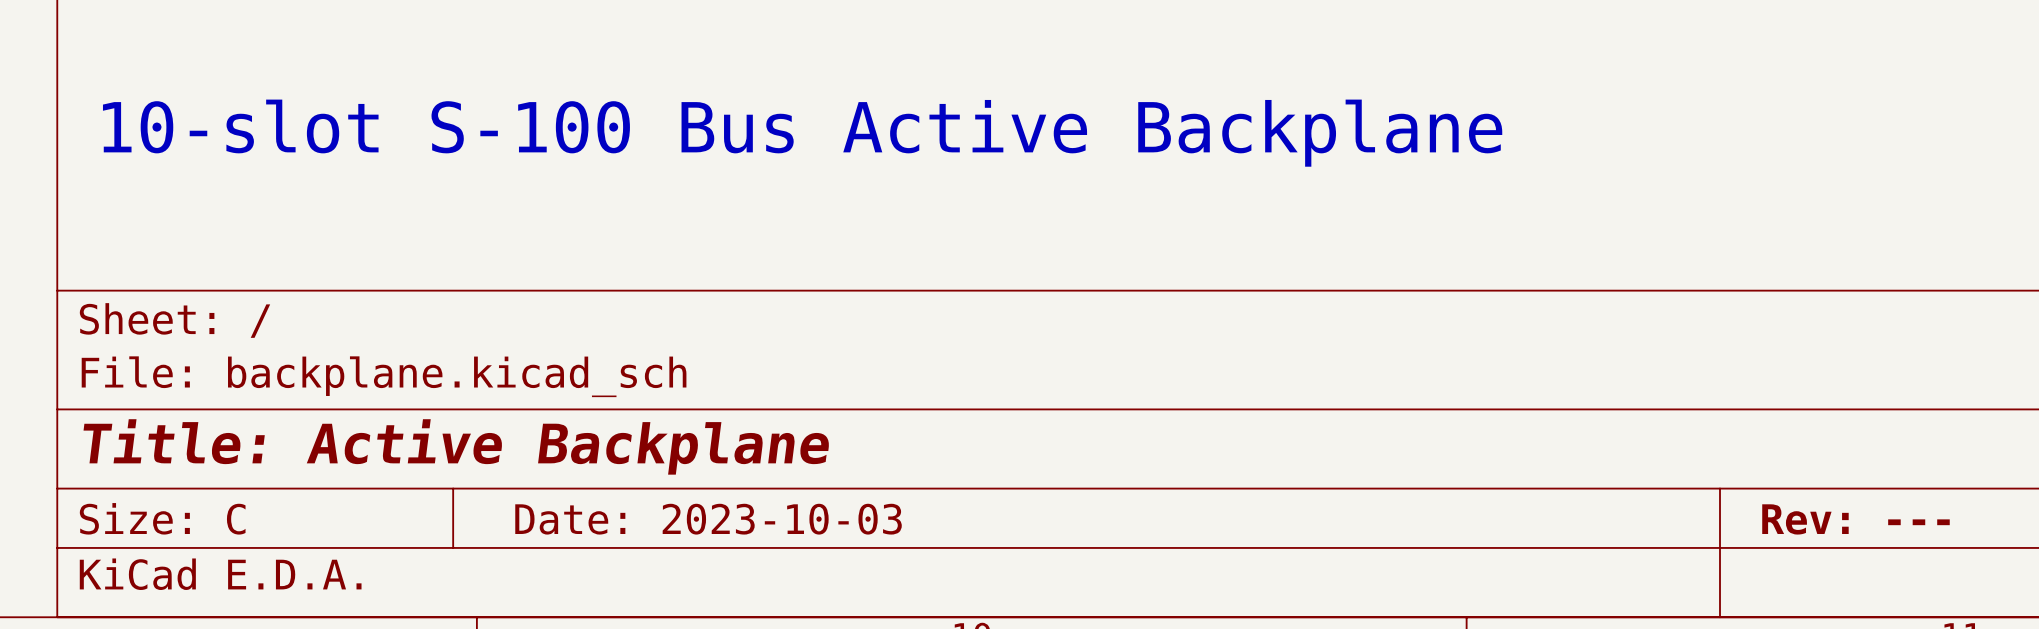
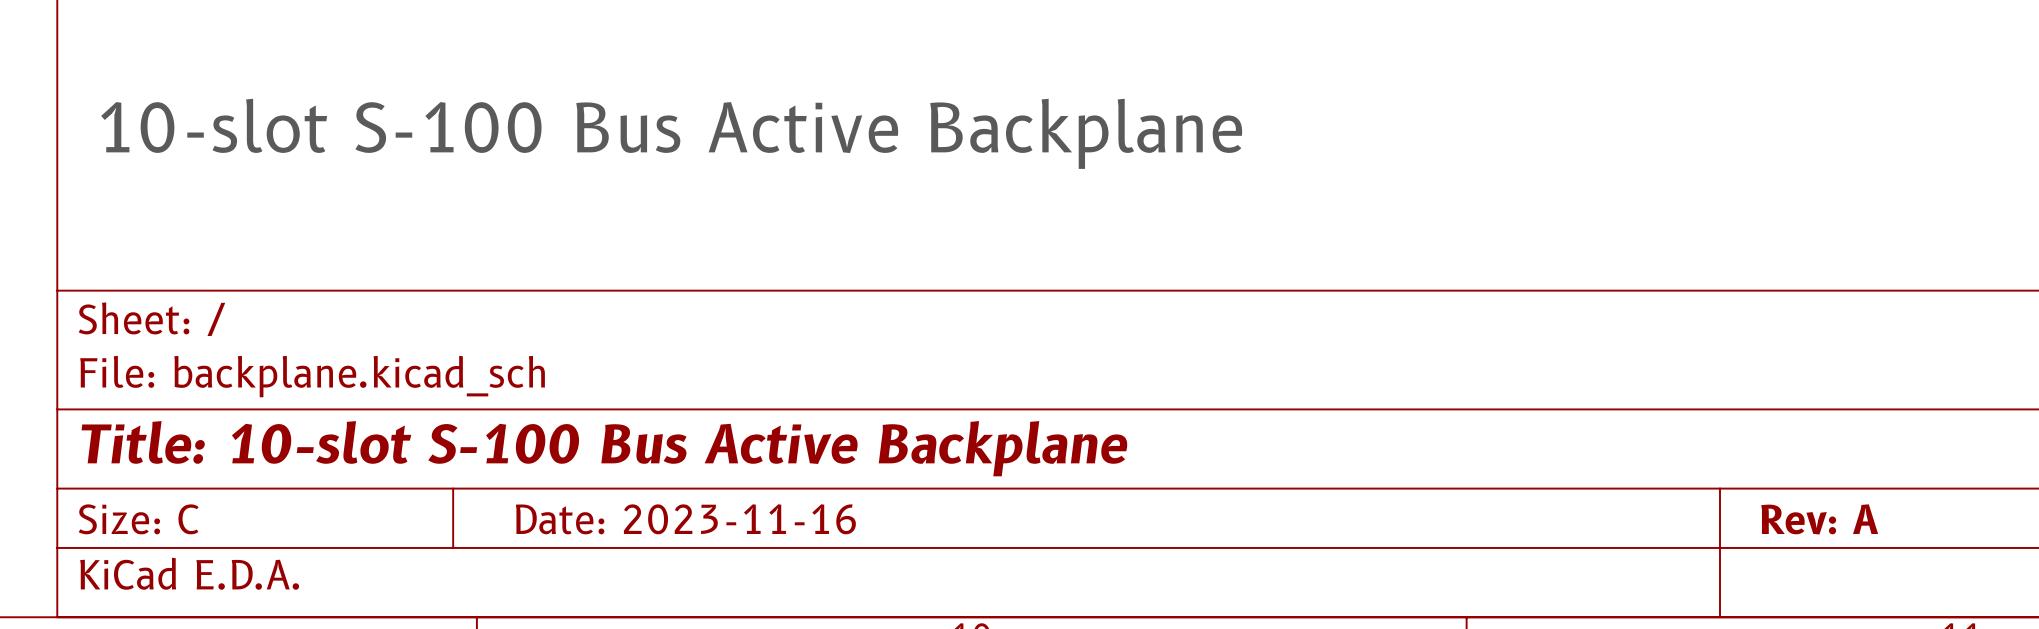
title block: Title: Active Backplane (456, 446) -> Title: 10-slot S-100 Bus Active Backplane (604, 448)
title block: Date: 2023-10-03 (708, 519) -> Date: 2023-11-16 (685, 519)
title block: Rev: --- (1855, 519) -> Rev: A (1819, 519)

